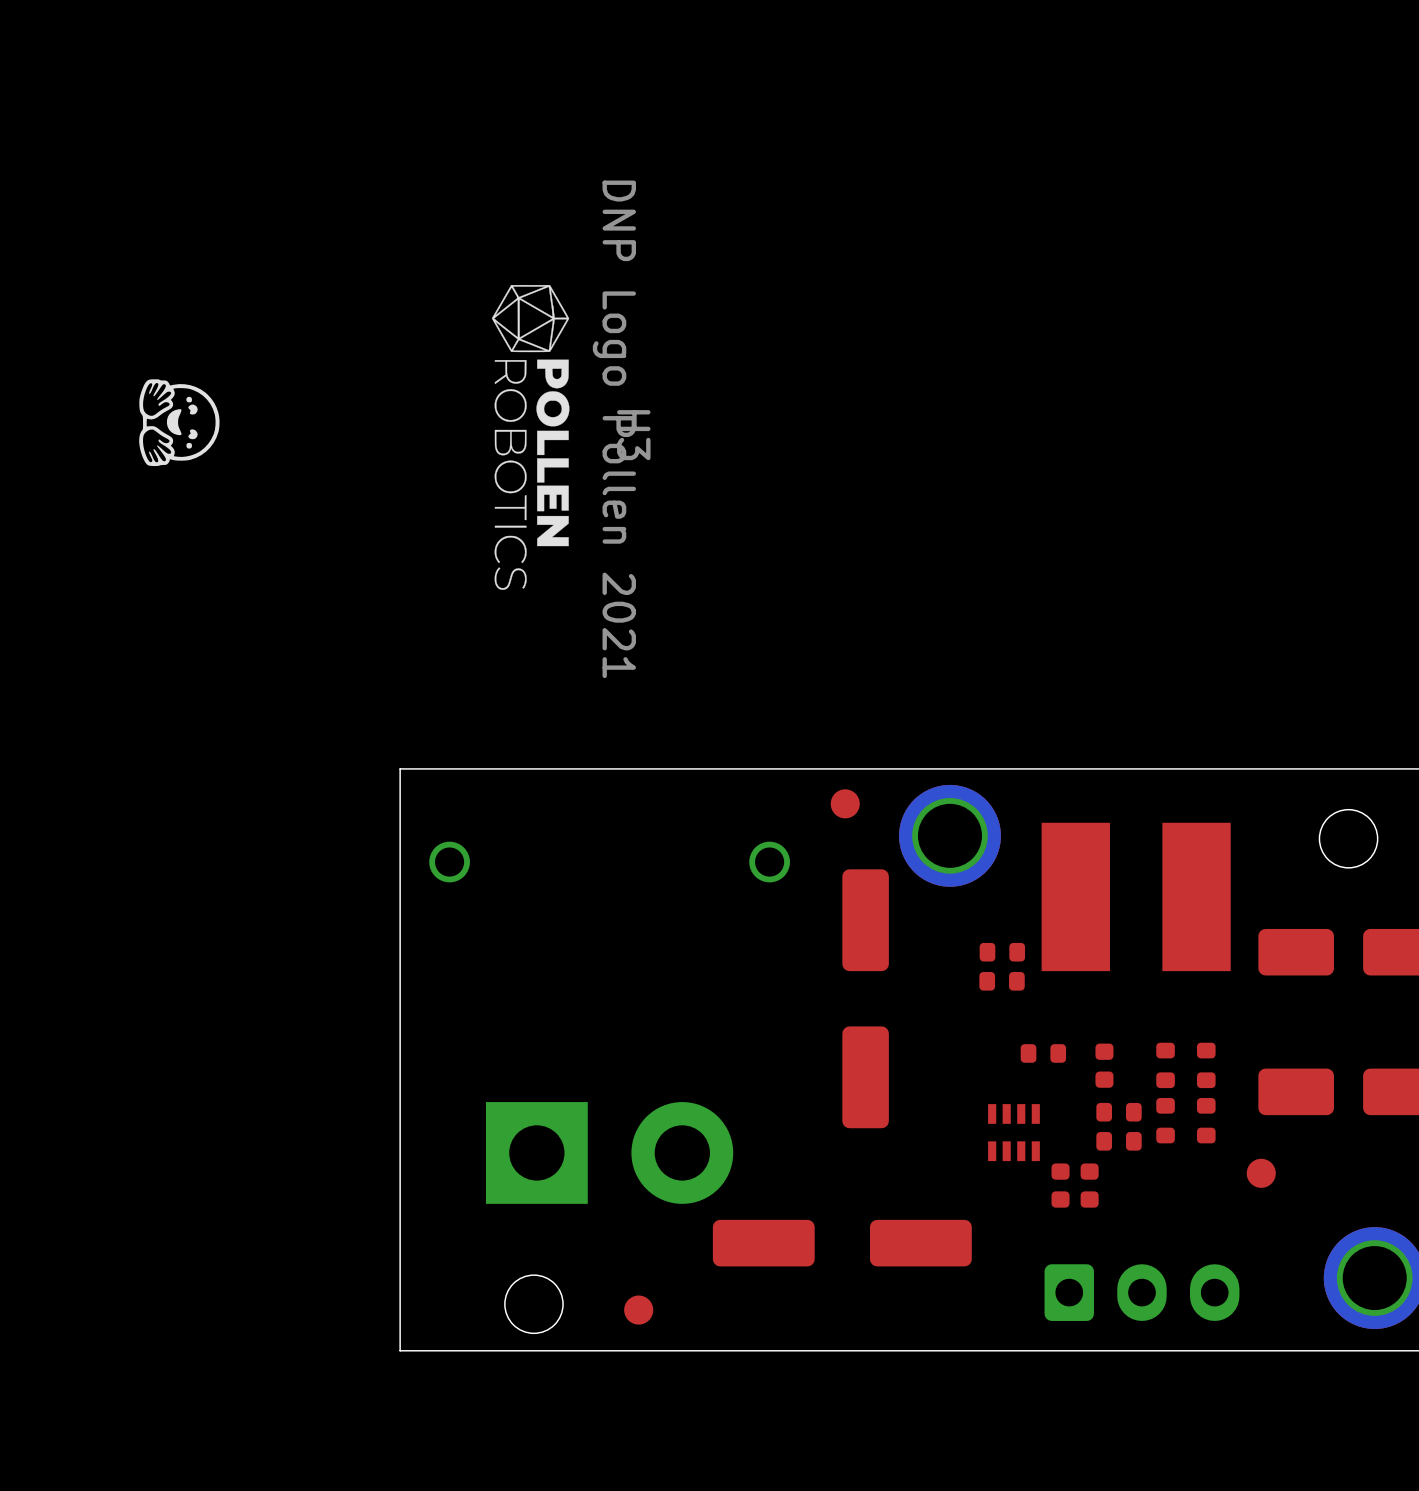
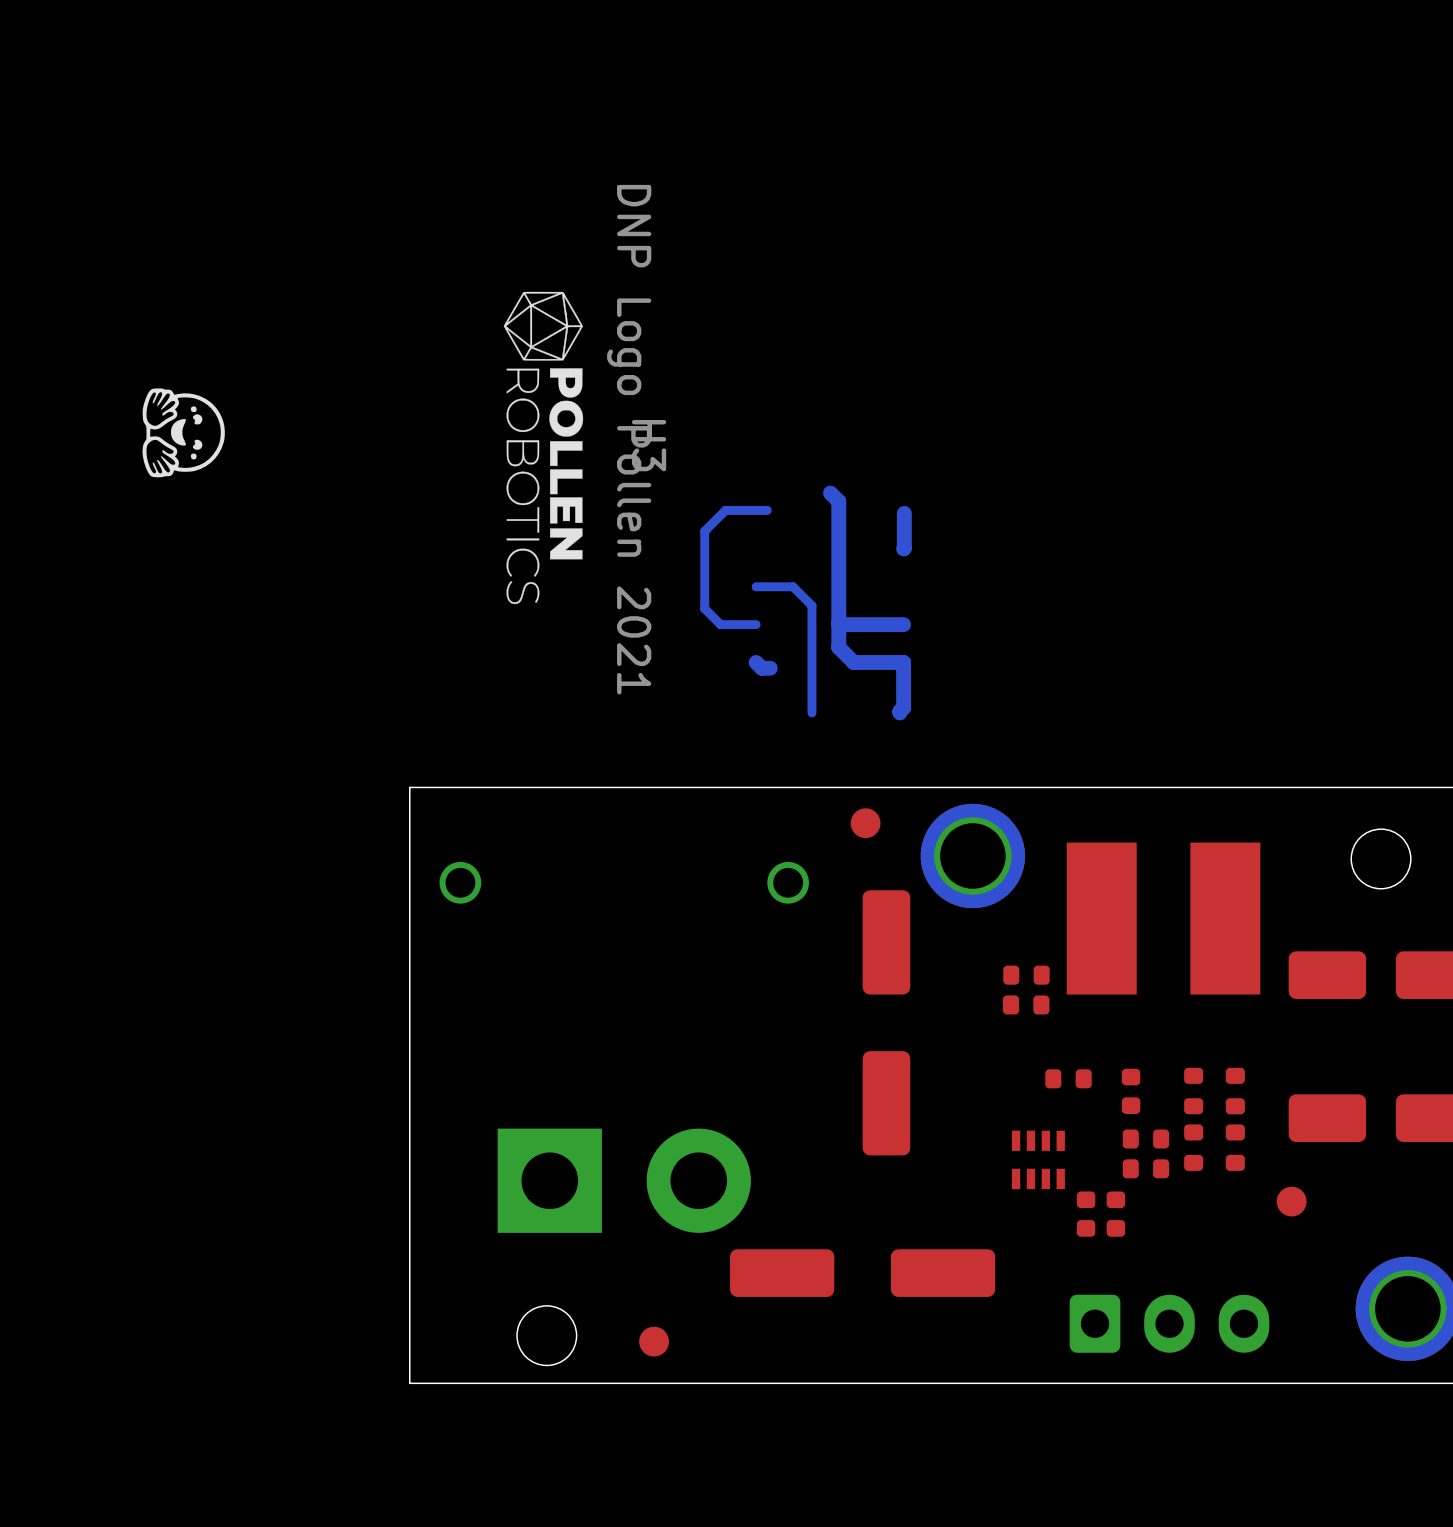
bottom track: none -> (830, 493) (838, 501) (838, 647) (853, 662) (903, 662) (903, 707) (899, 712)
bottom track: none -> (767, 510) (725, 510) (704, 531) (704, 608) (720, 624) (756, 624)
bottom track: none -> (904, 513) (903, 548)
bottom track: none -> (756, 586) (793, 586) (811, 605) (811, 712)
bottom track: none -> (838, 623) (903, 624)
bottom track: none -> (756, 662) (761, 668) (770, 668)

